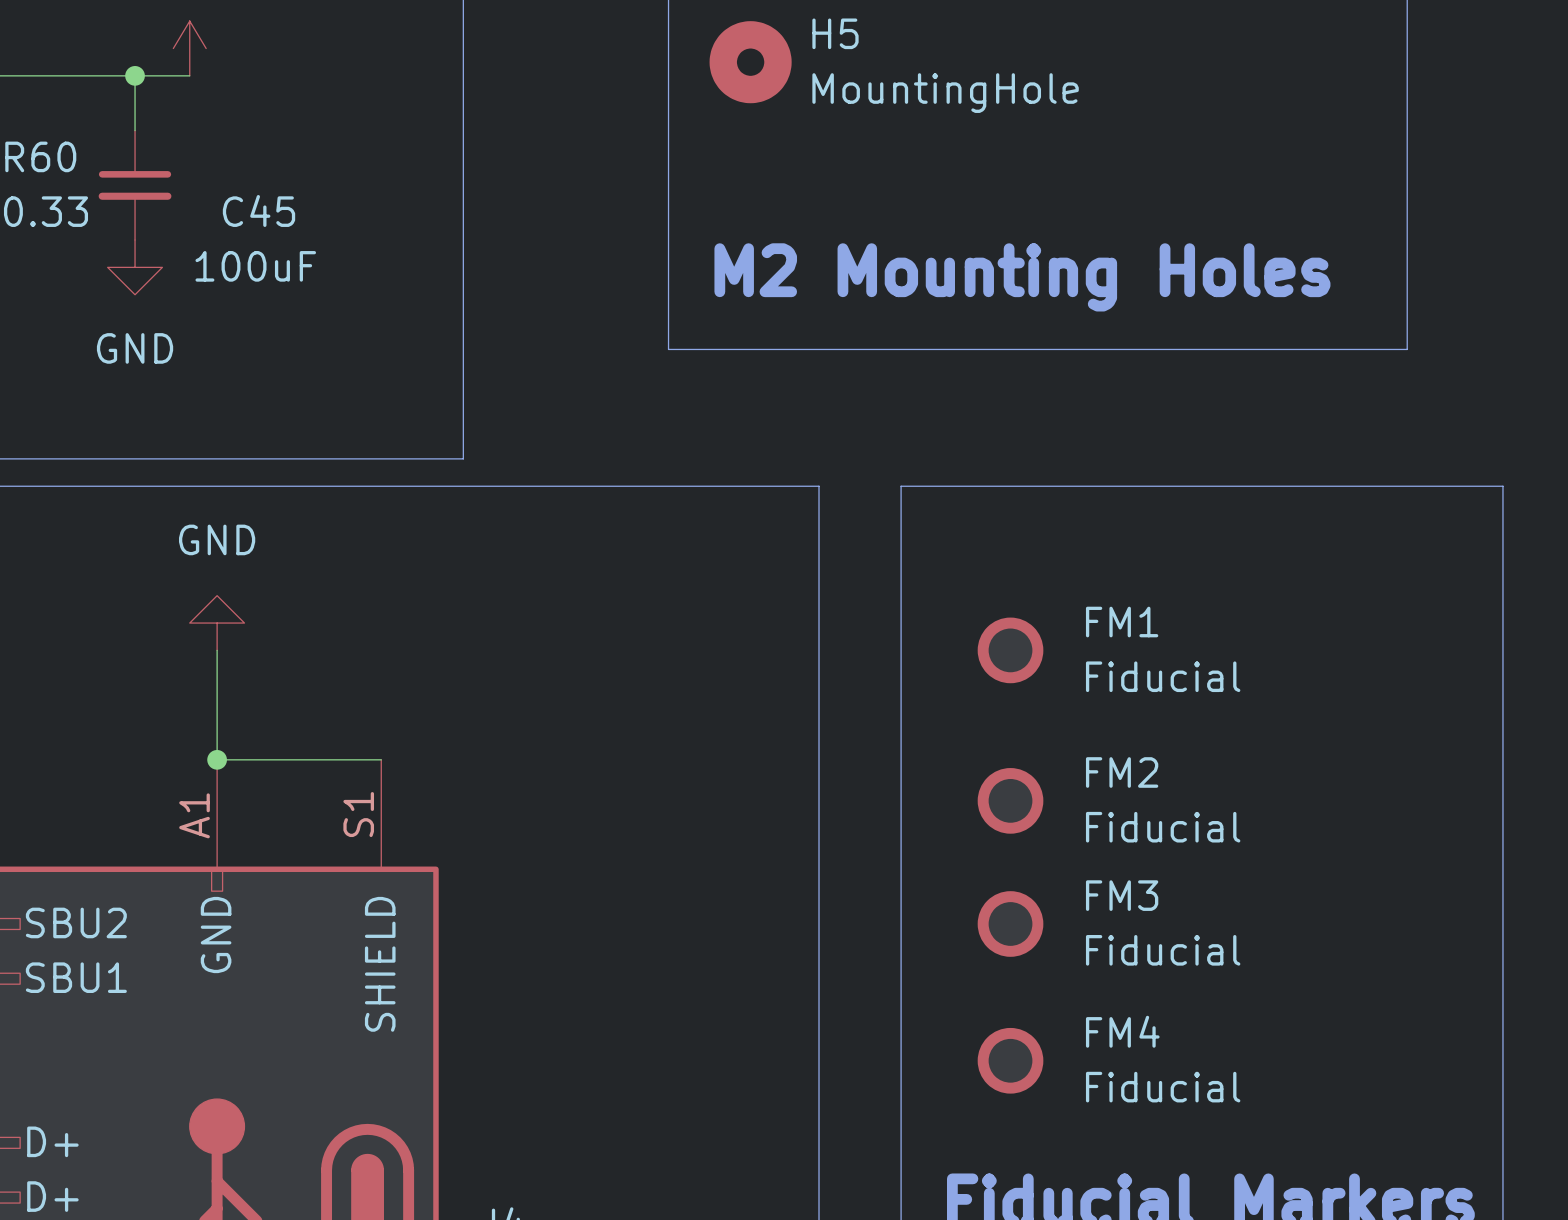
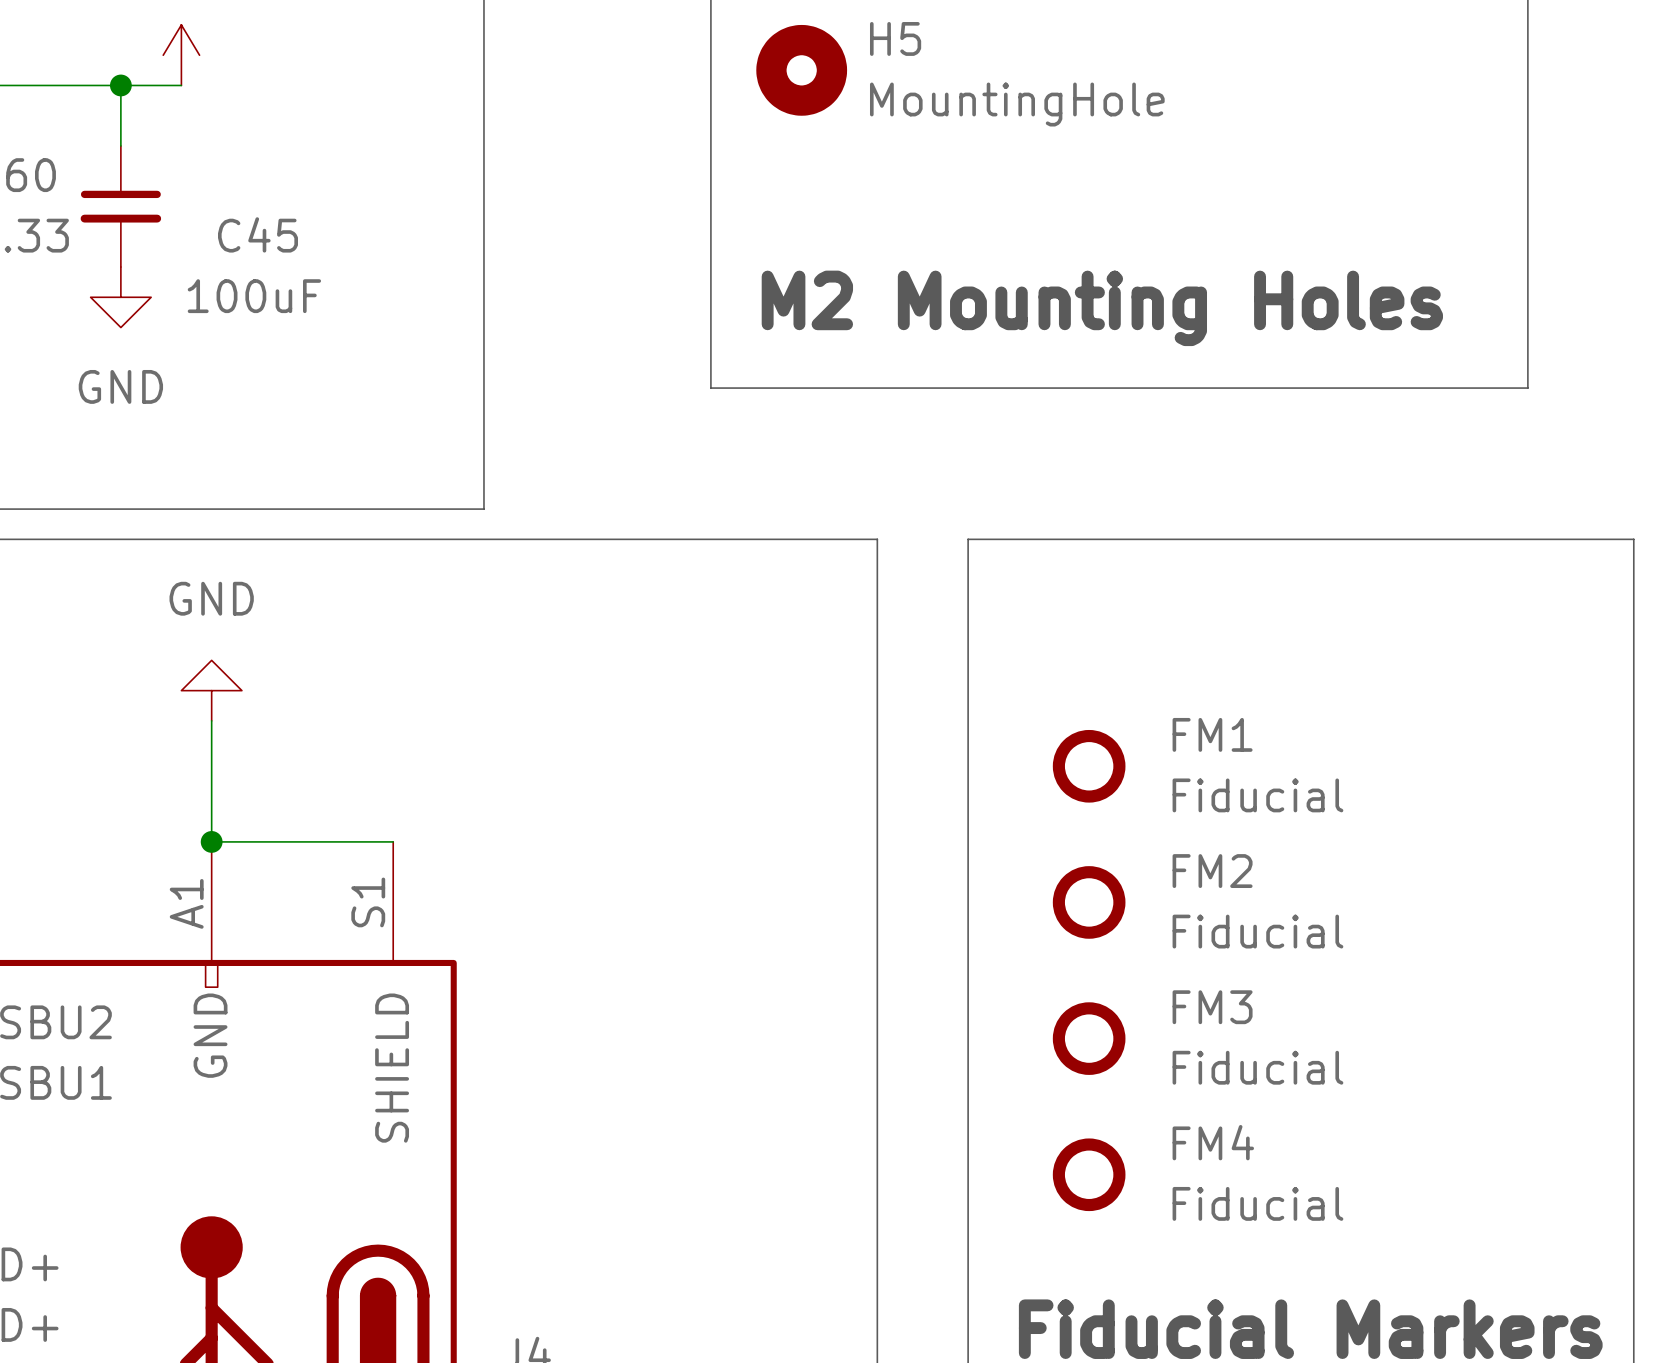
FM1 position: (1010, 650) -> (1089, 766)
FM2 position: (1010, 800) -> (1089, 902)
FM3 position: (1010, 923) -> (1089, 1038)

